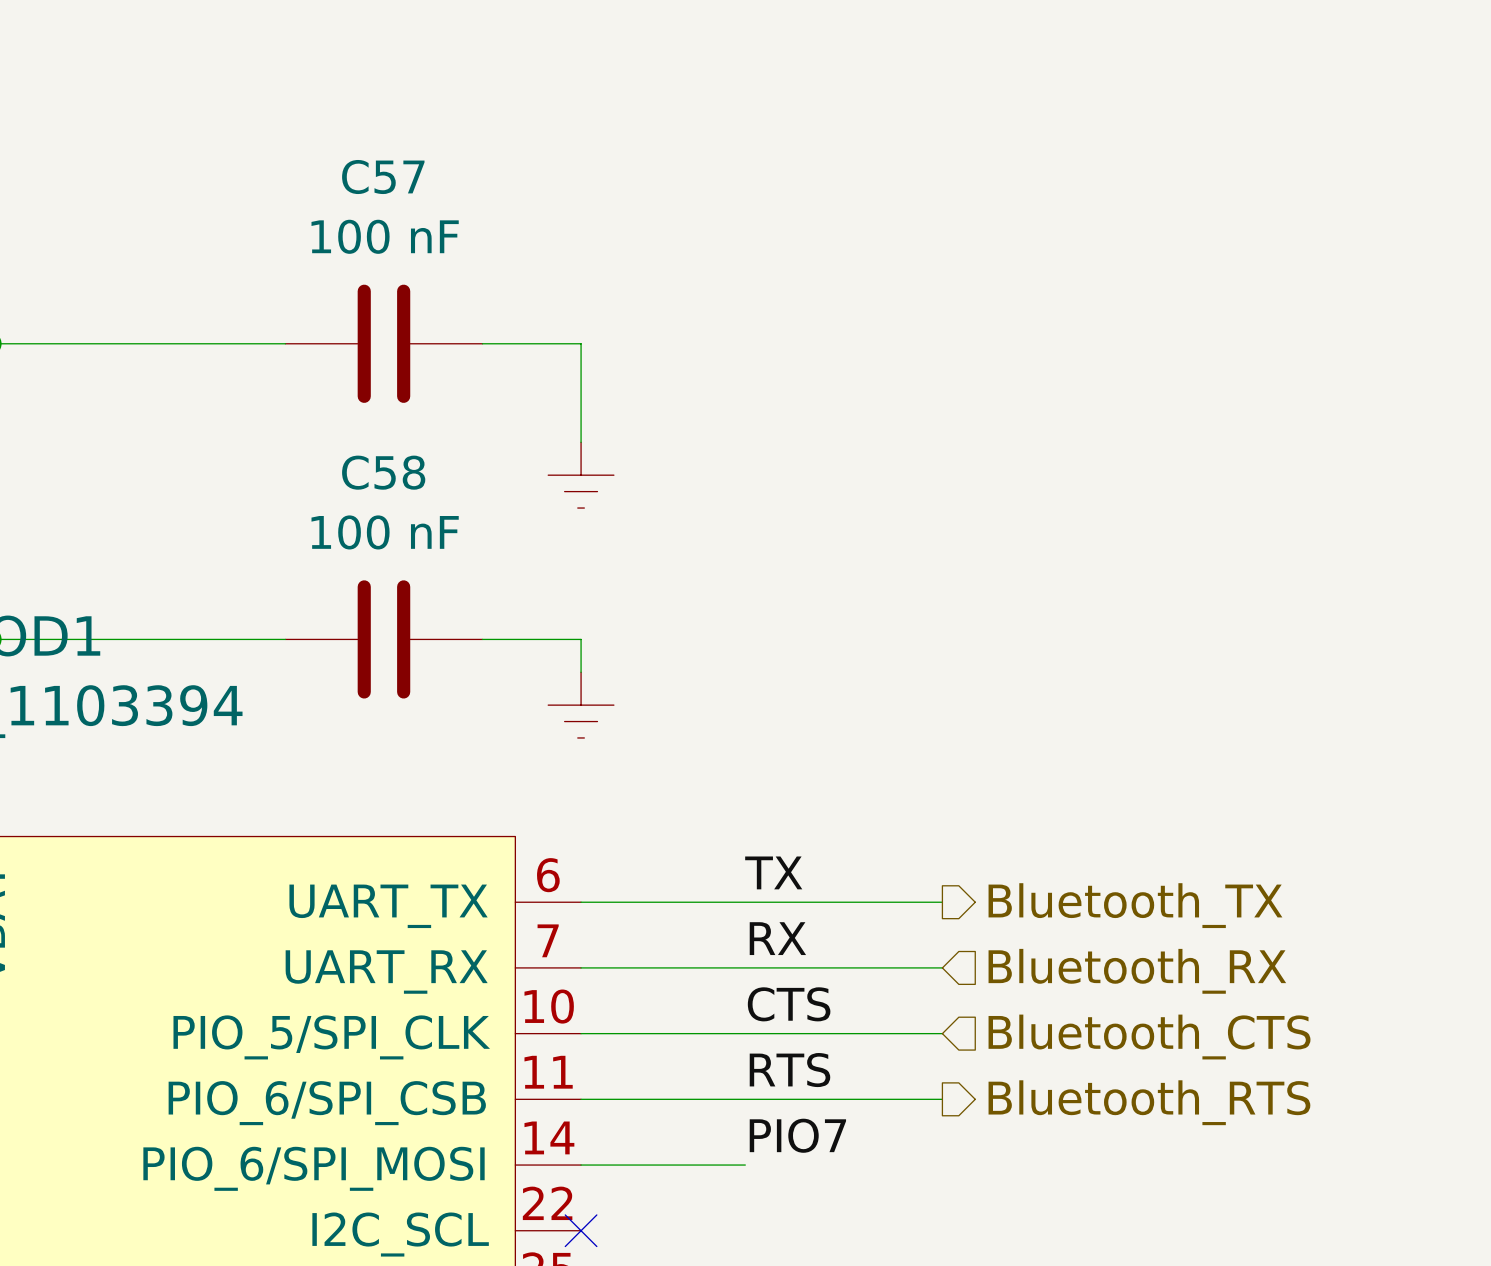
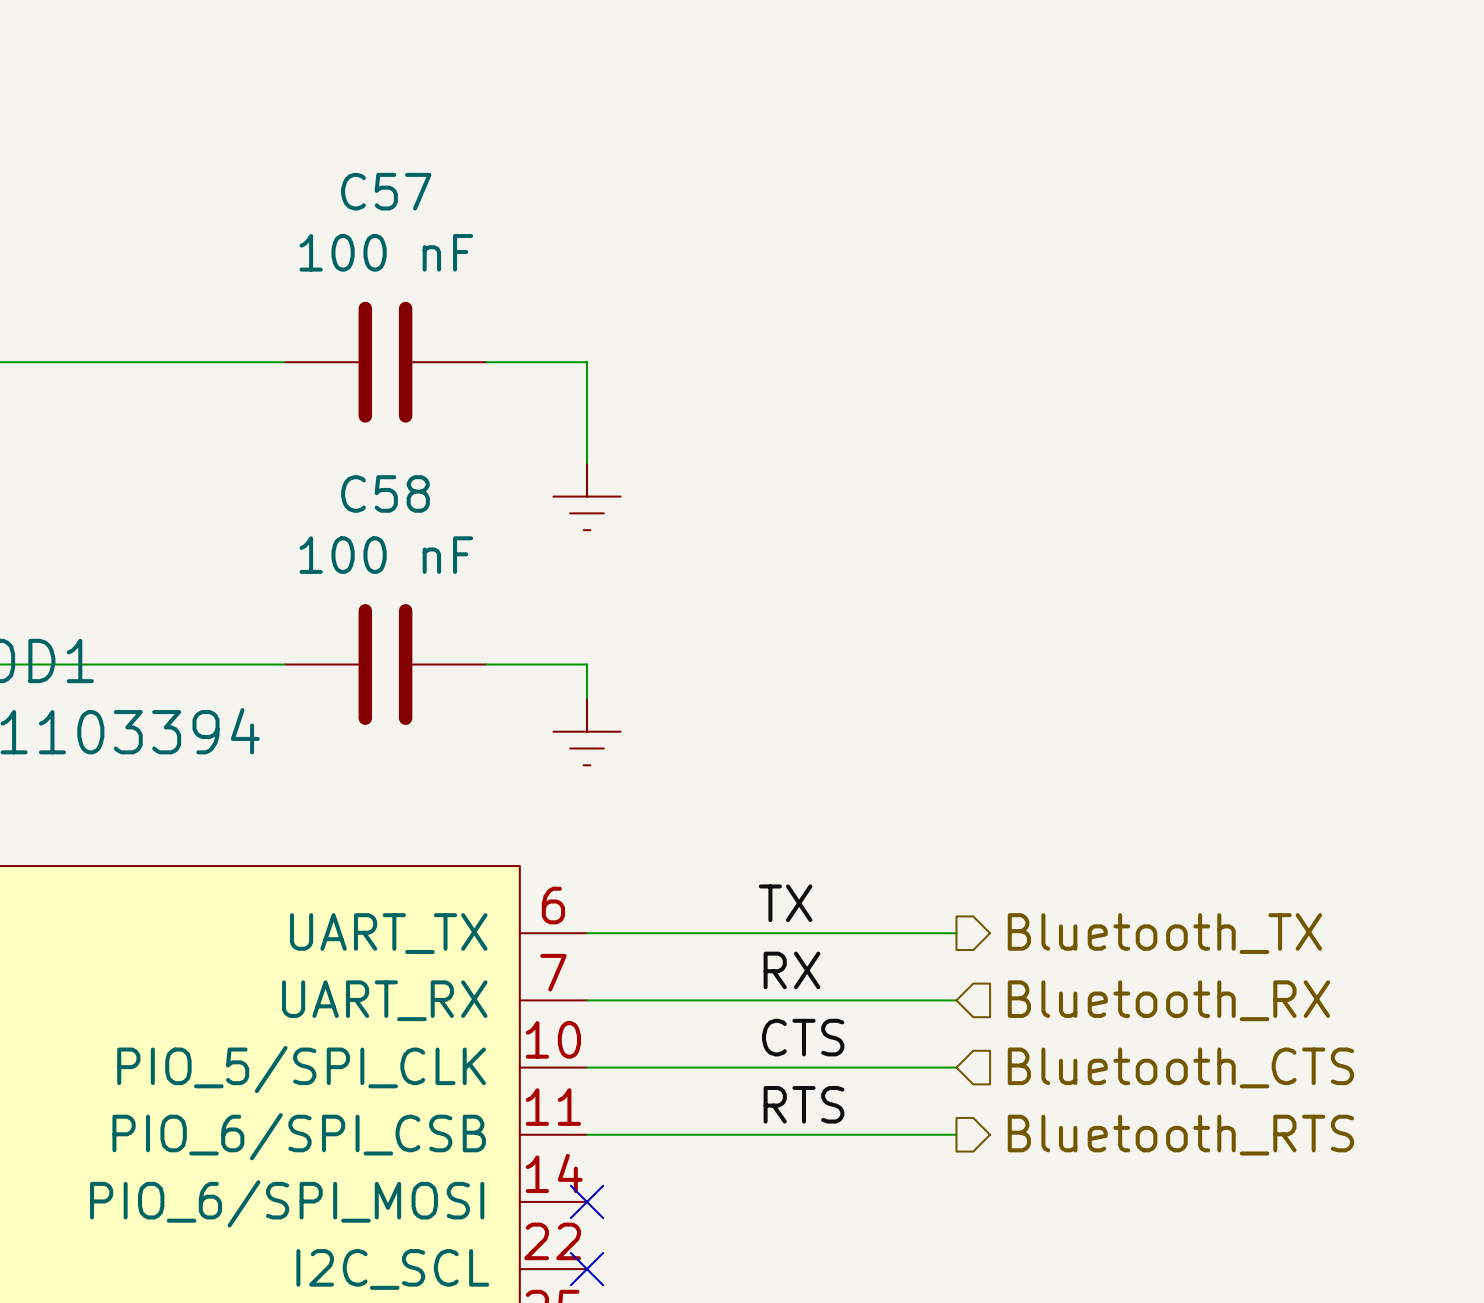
label: PIO7 (797, 1135) -> none
wire: (581, 1165) (745, 1165) -> none
no-connect mark: none -> (587, 1201)

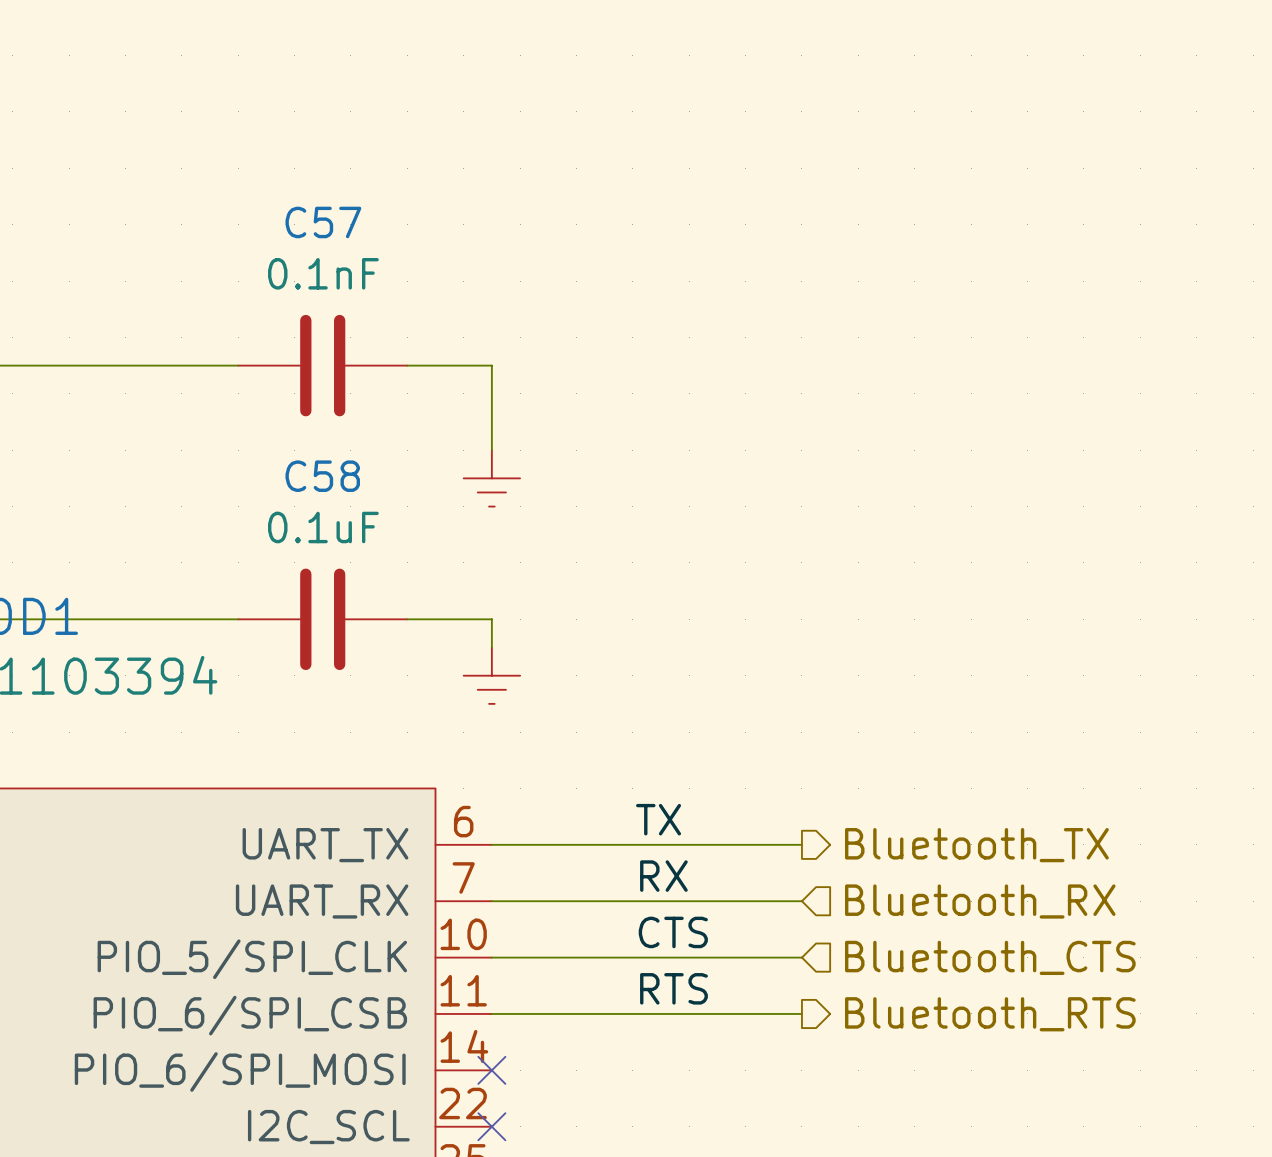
C57 value: 100 nF (386, 252) -> 0.1nF (323, 273)
C58 value: 100 nF (386, 555) -> 0.1uF (323, 527)

